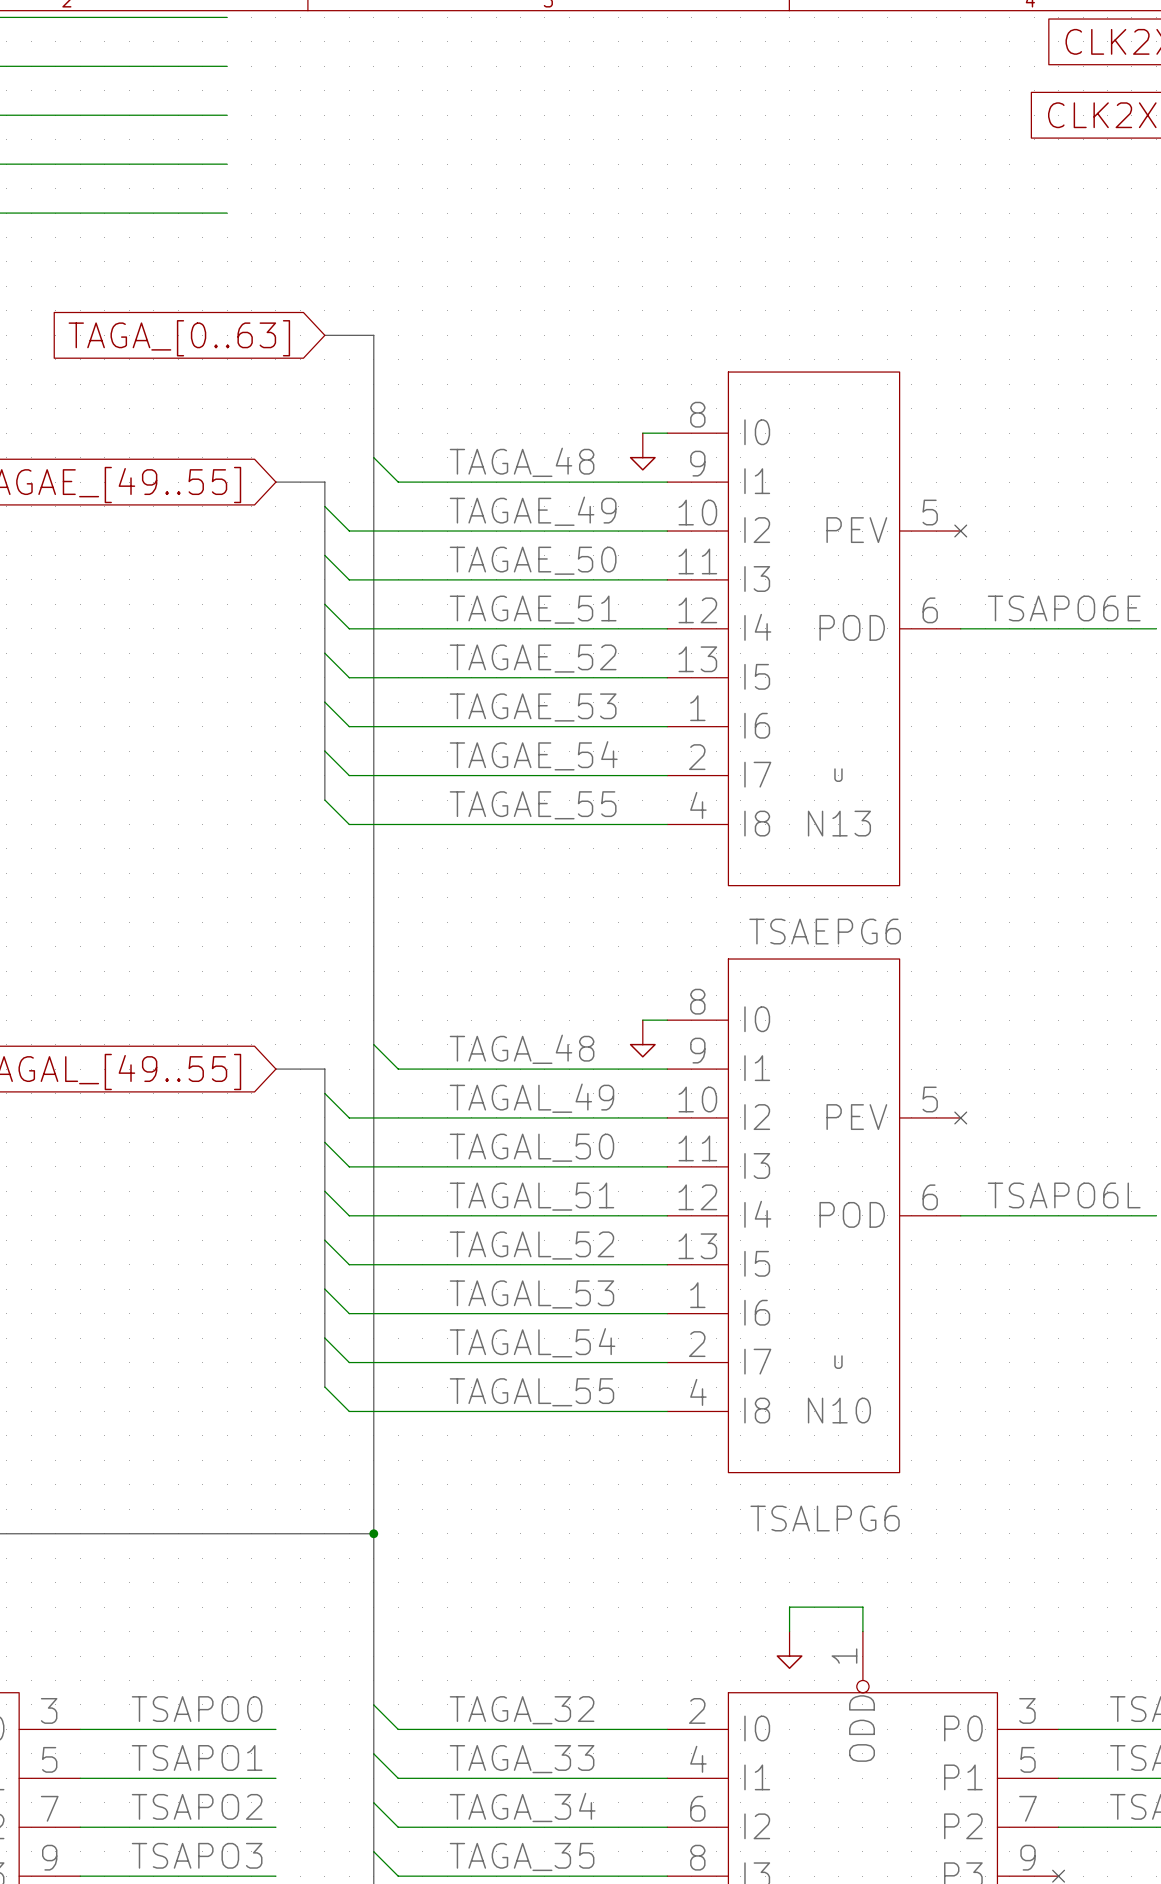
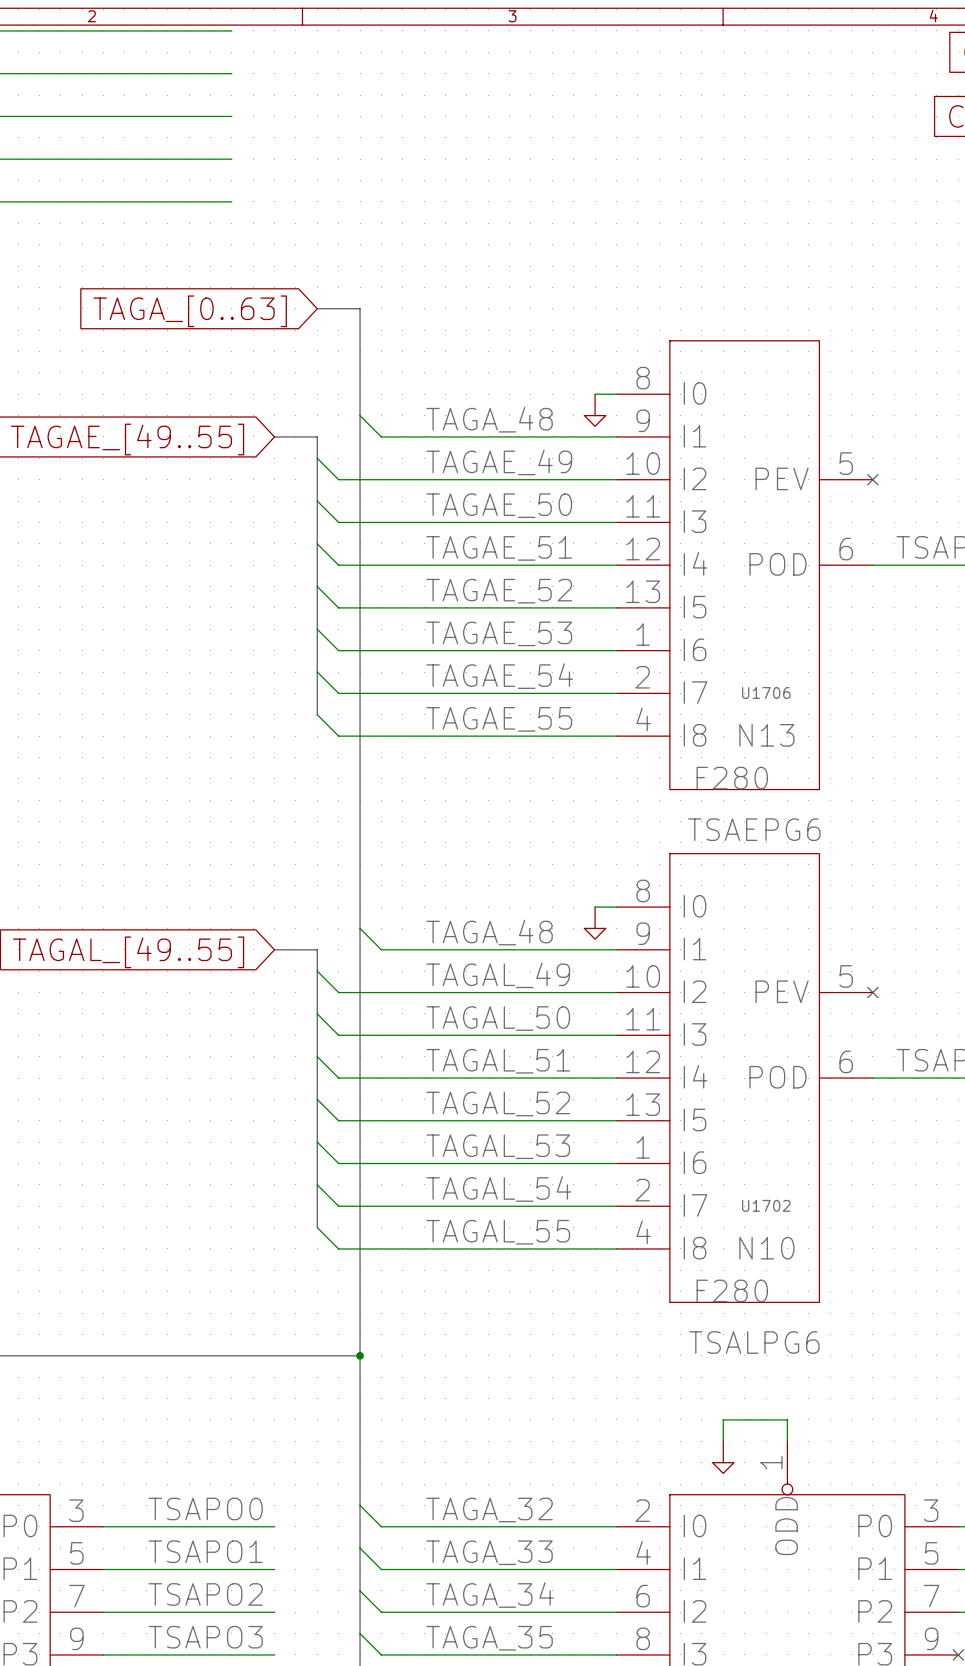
U name: U (838, 775) -> U1706 (766, 692)
U value: none -> F280 (732, 778)
U name: U (838, 1362) -> U1702 (766, 1205)
U value: none -> F280 (732, 1290)

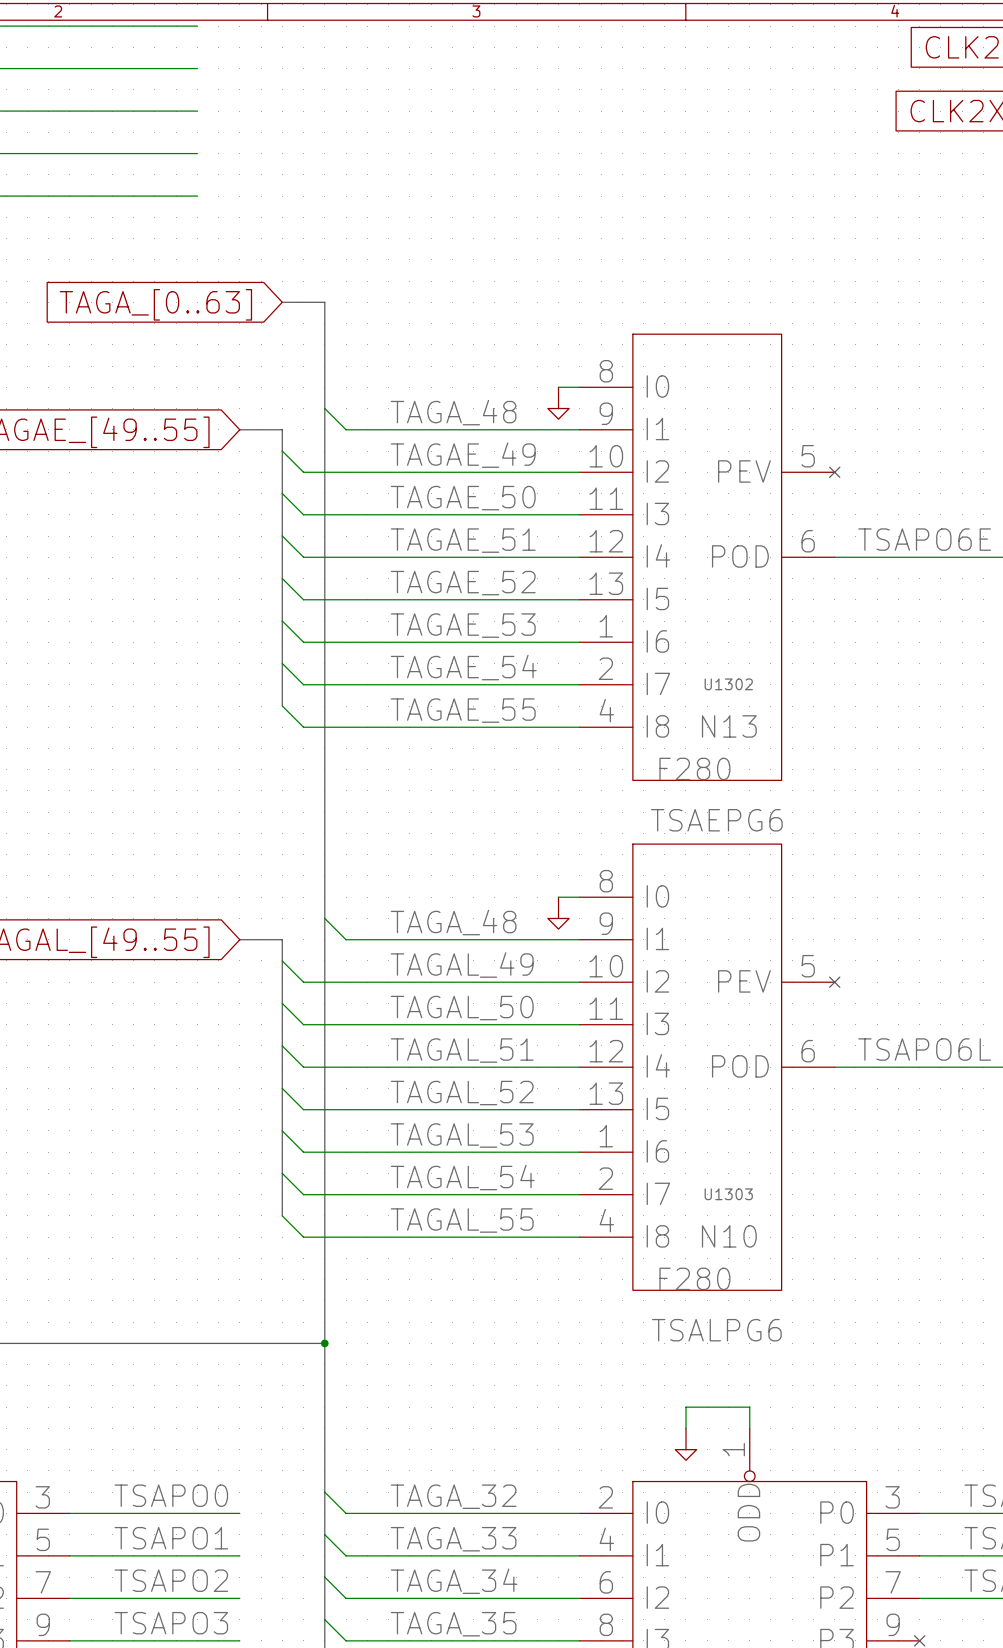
U1706 name: U1706 (766, 692) -> U1302 (728, 684)
U1702 name: U1702 (766, 1205) -> U1303 (728, 1194)

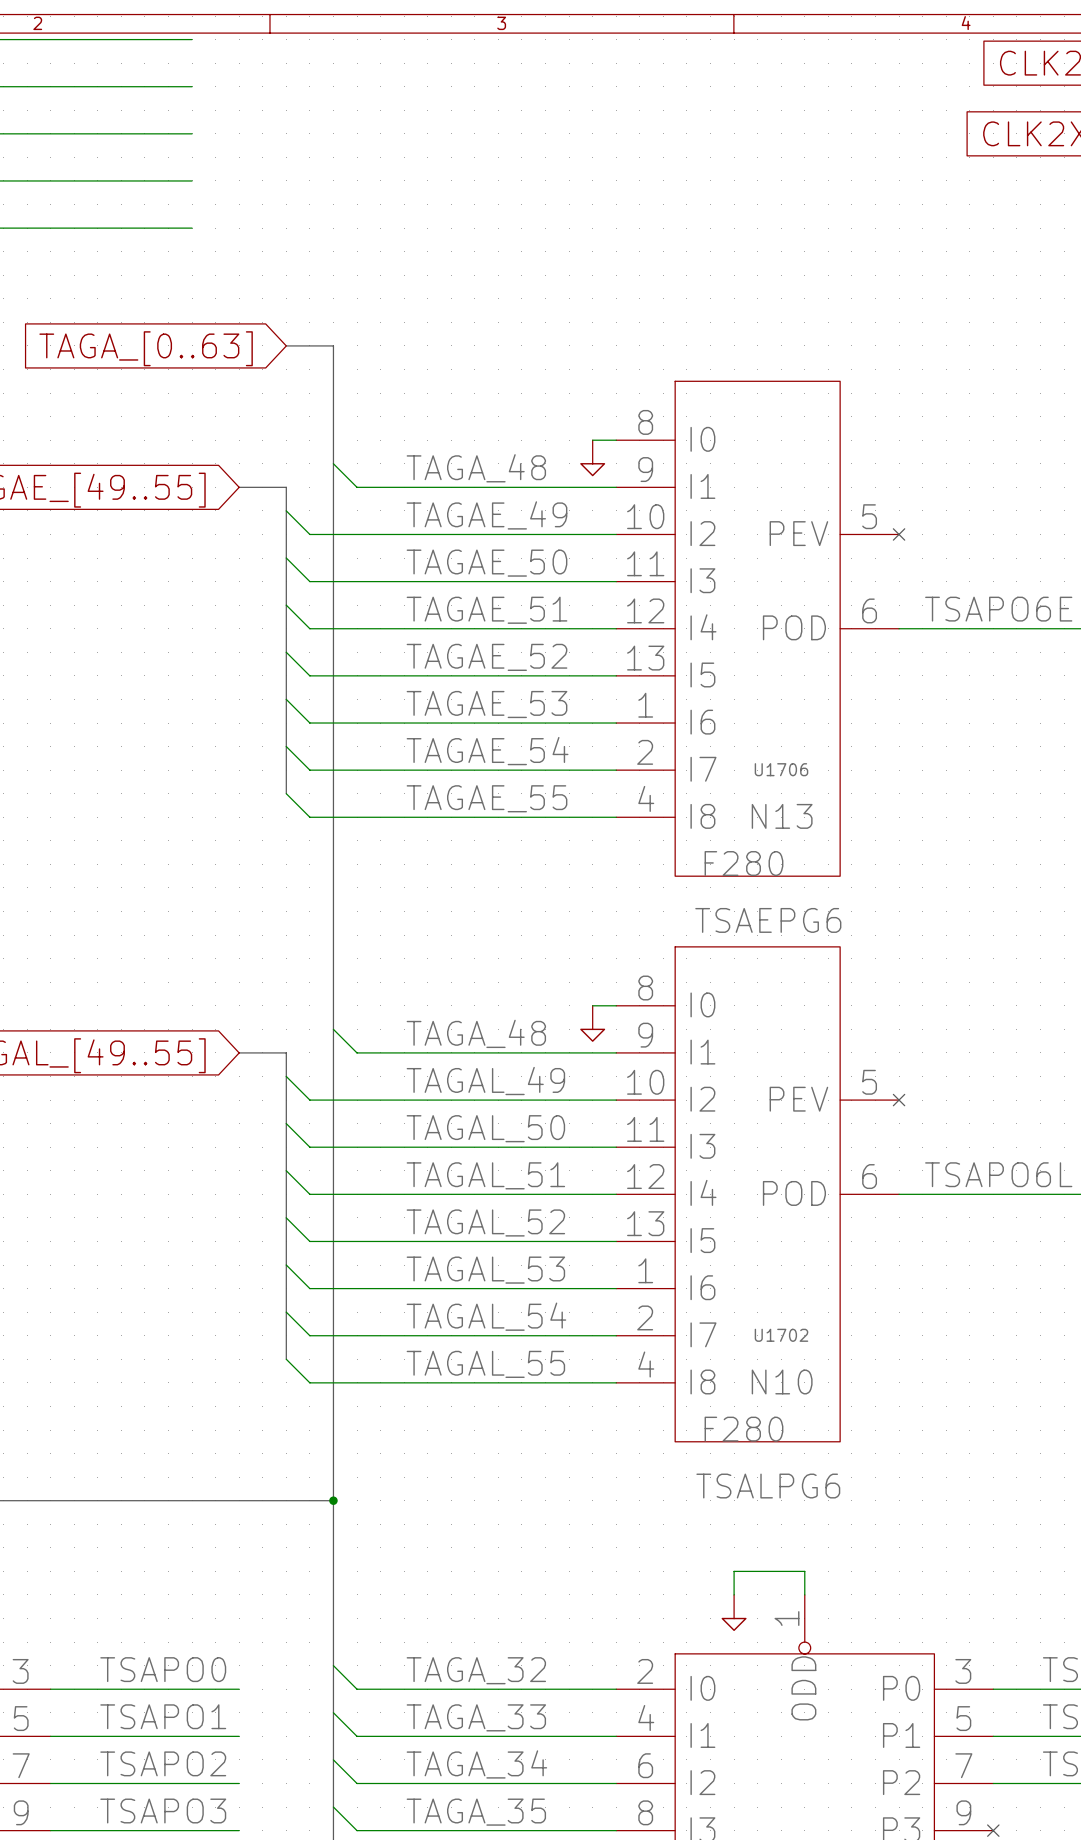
U1302 name: U1302 (728, 684) -> U1706 (781, 769)
U1303 name: U1303 (728, 1194) -> U1702 (781, 1335)

